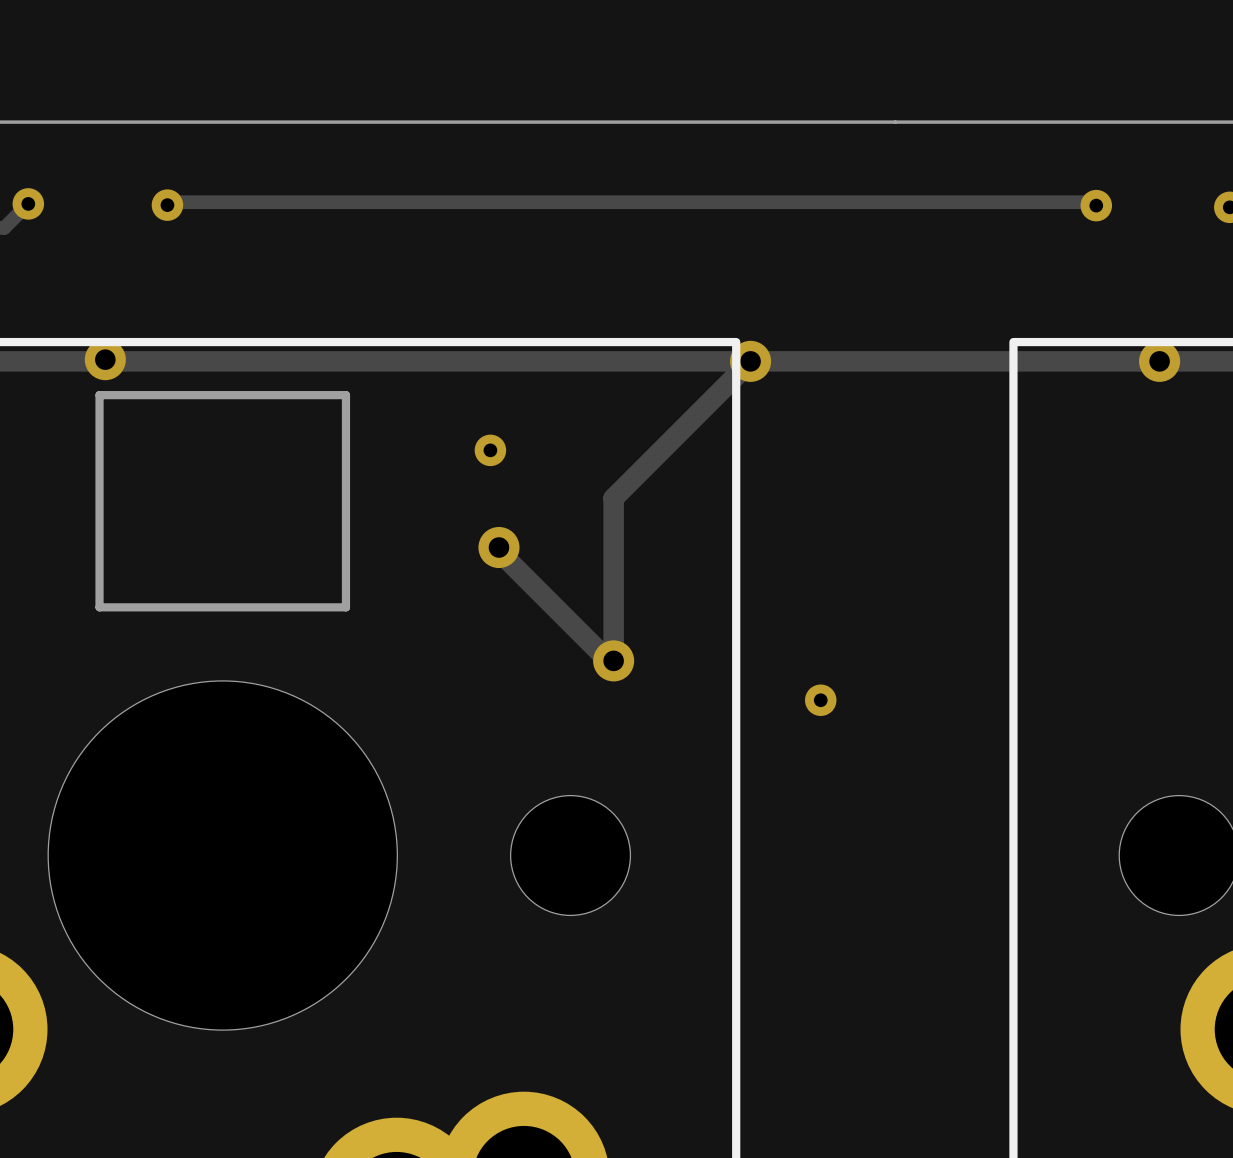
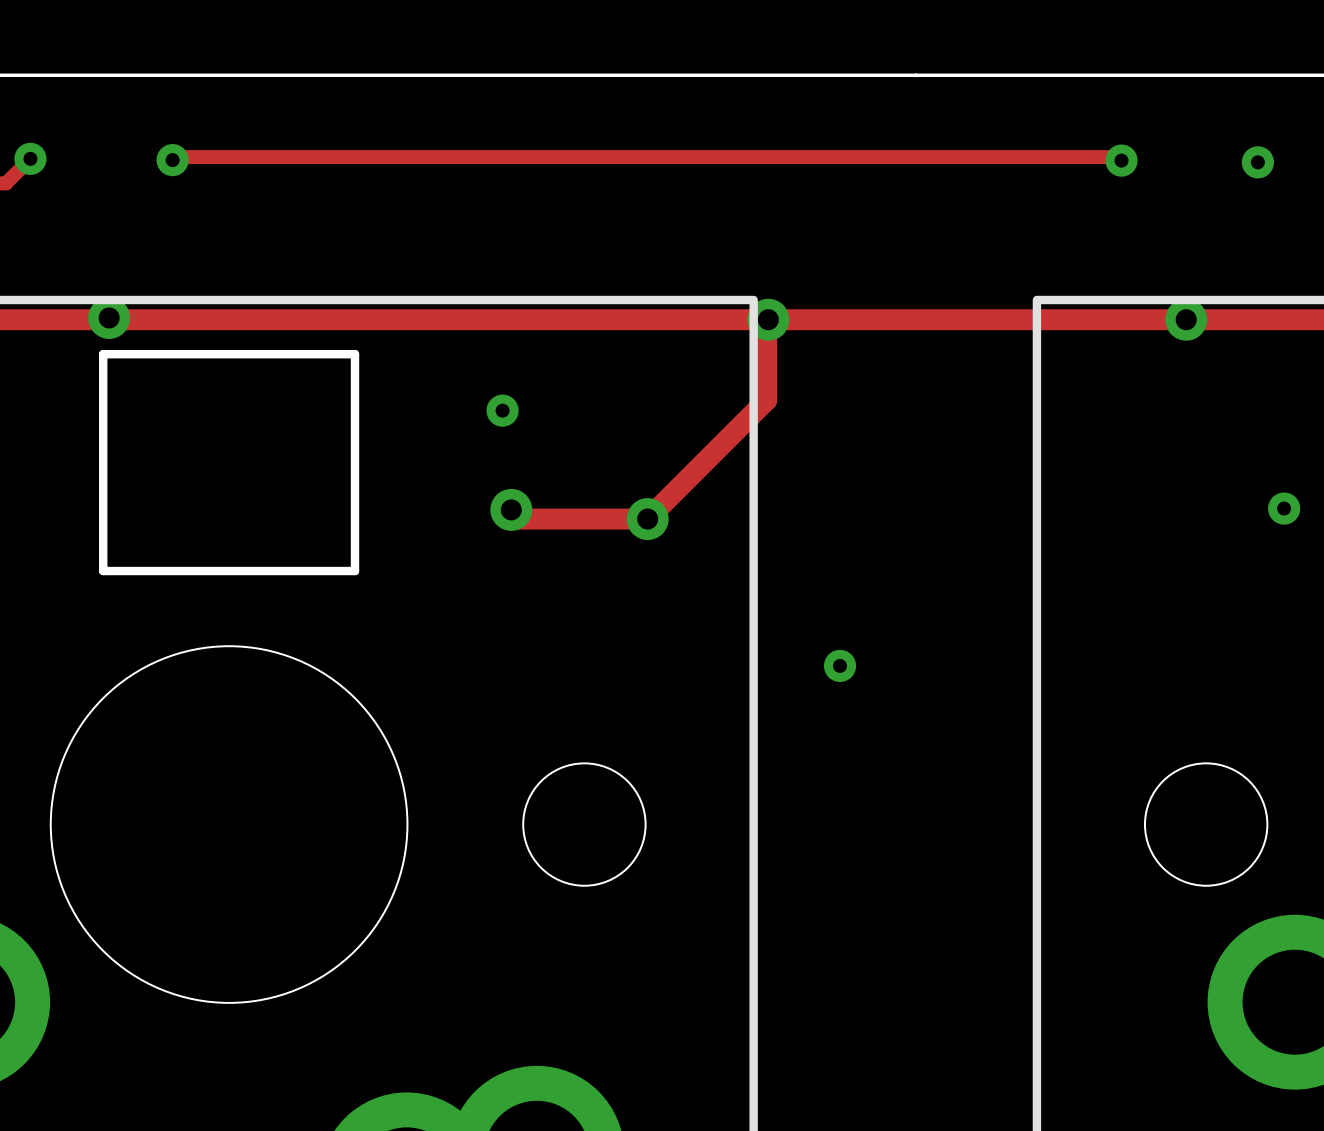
track: (748, 363) (613, 498) (613, 660) (608, 660) (504, 556) -> (766, 321) (766, 400) (647, 519) (516, 519)
via position: (613, 660) -> (647, 519)

